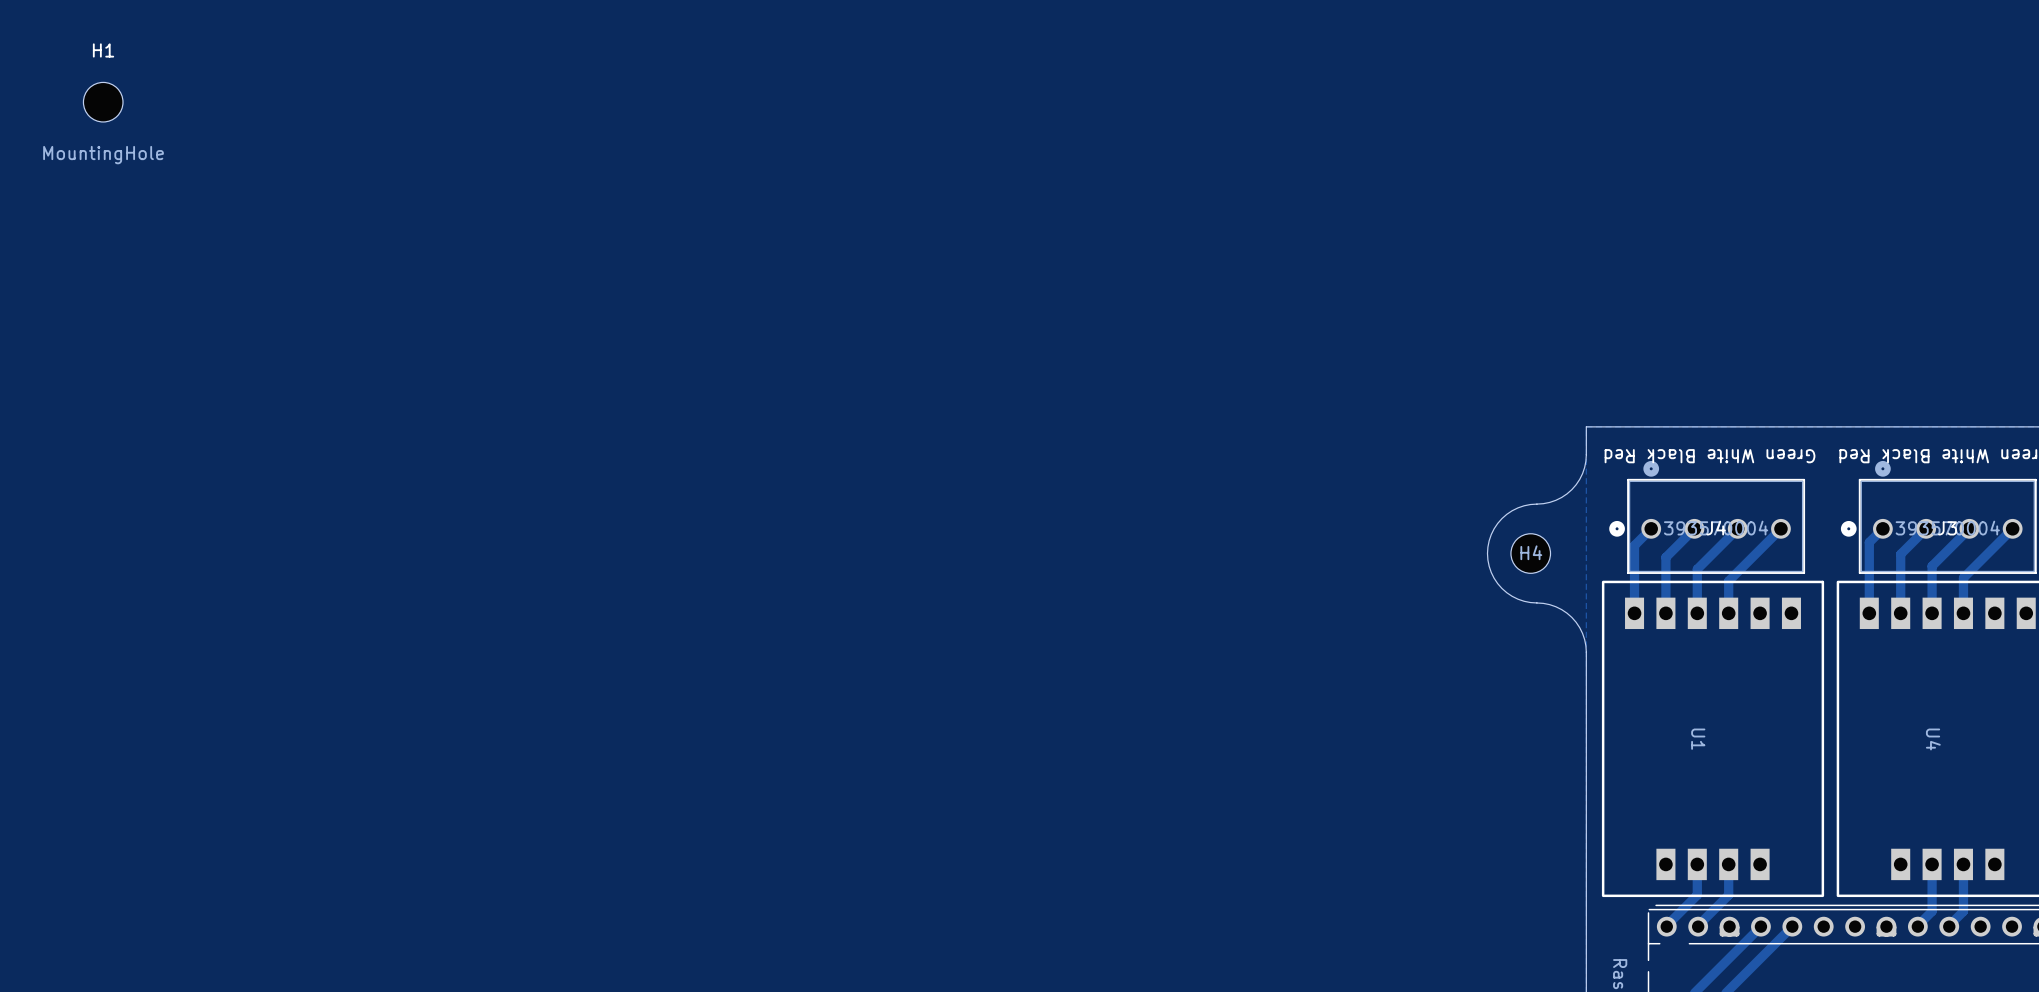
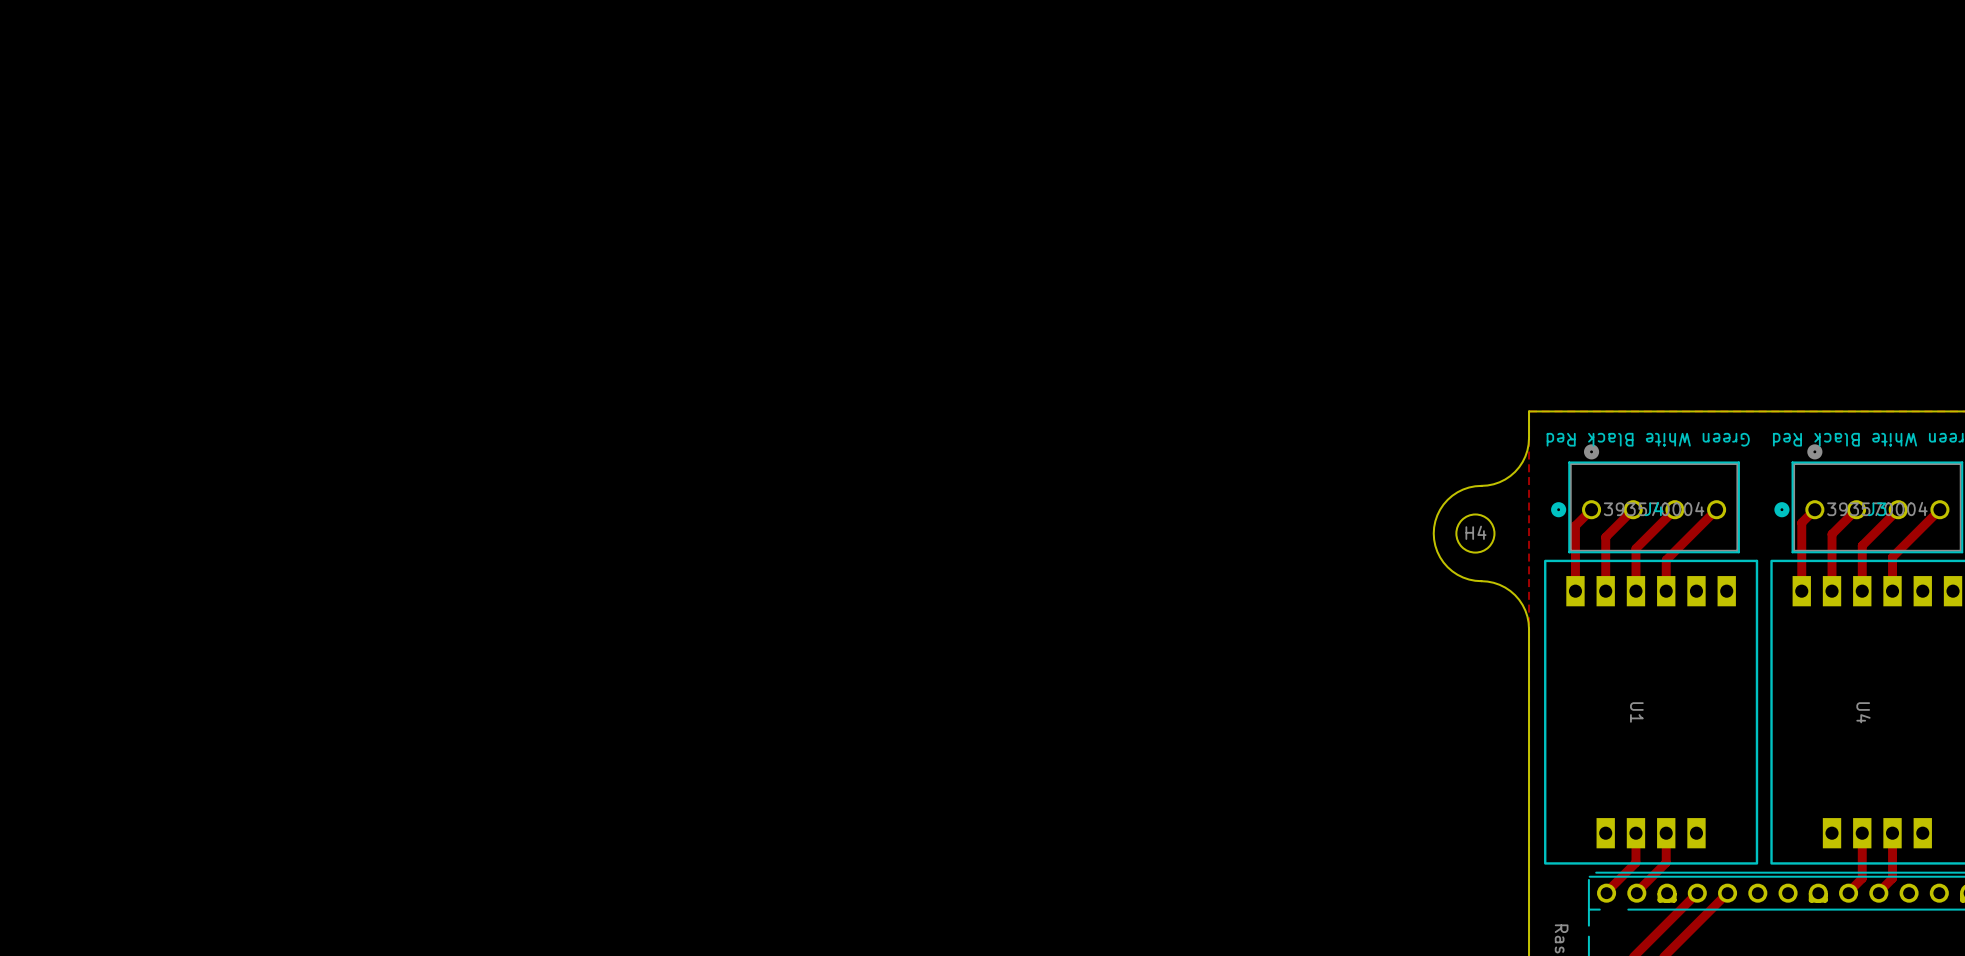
H1: MountingHole (103, 102) -> none

